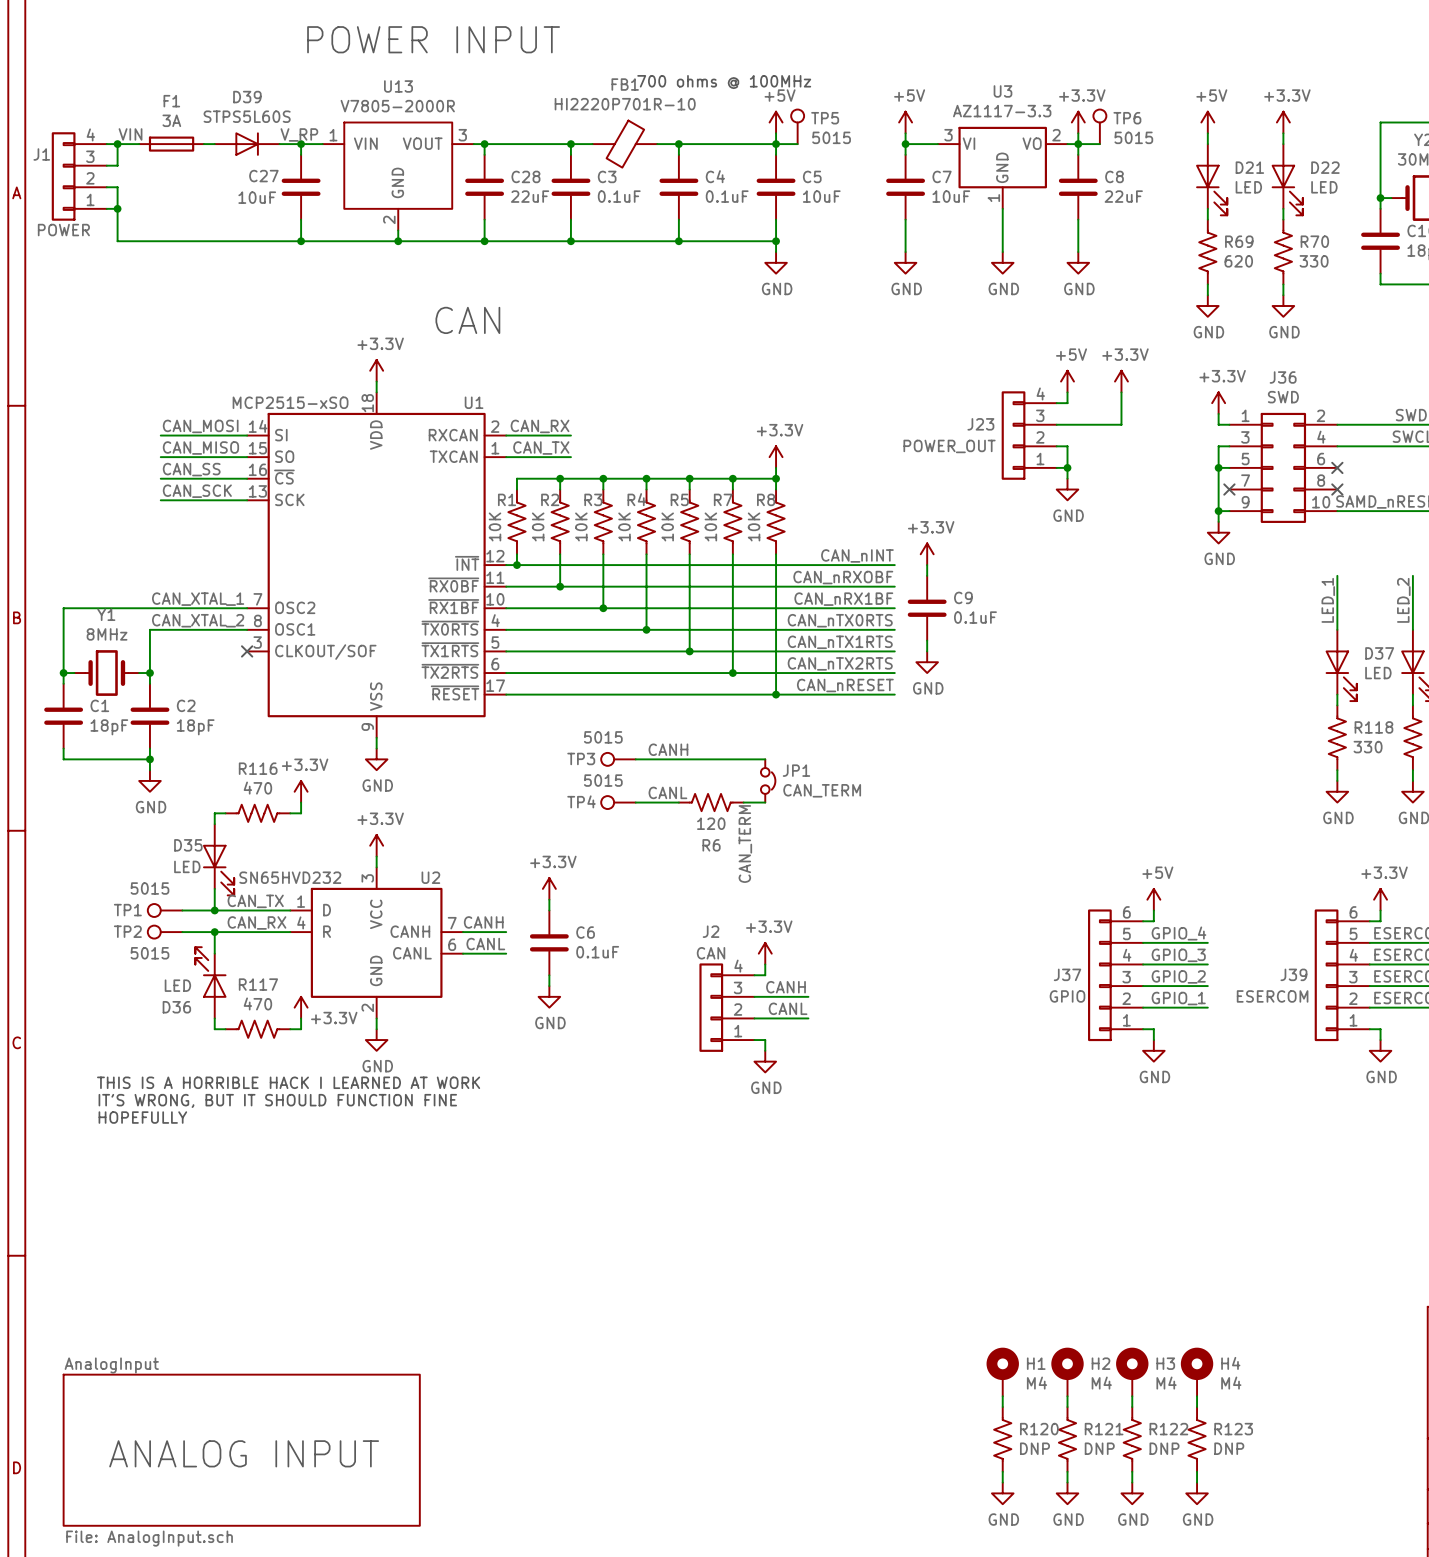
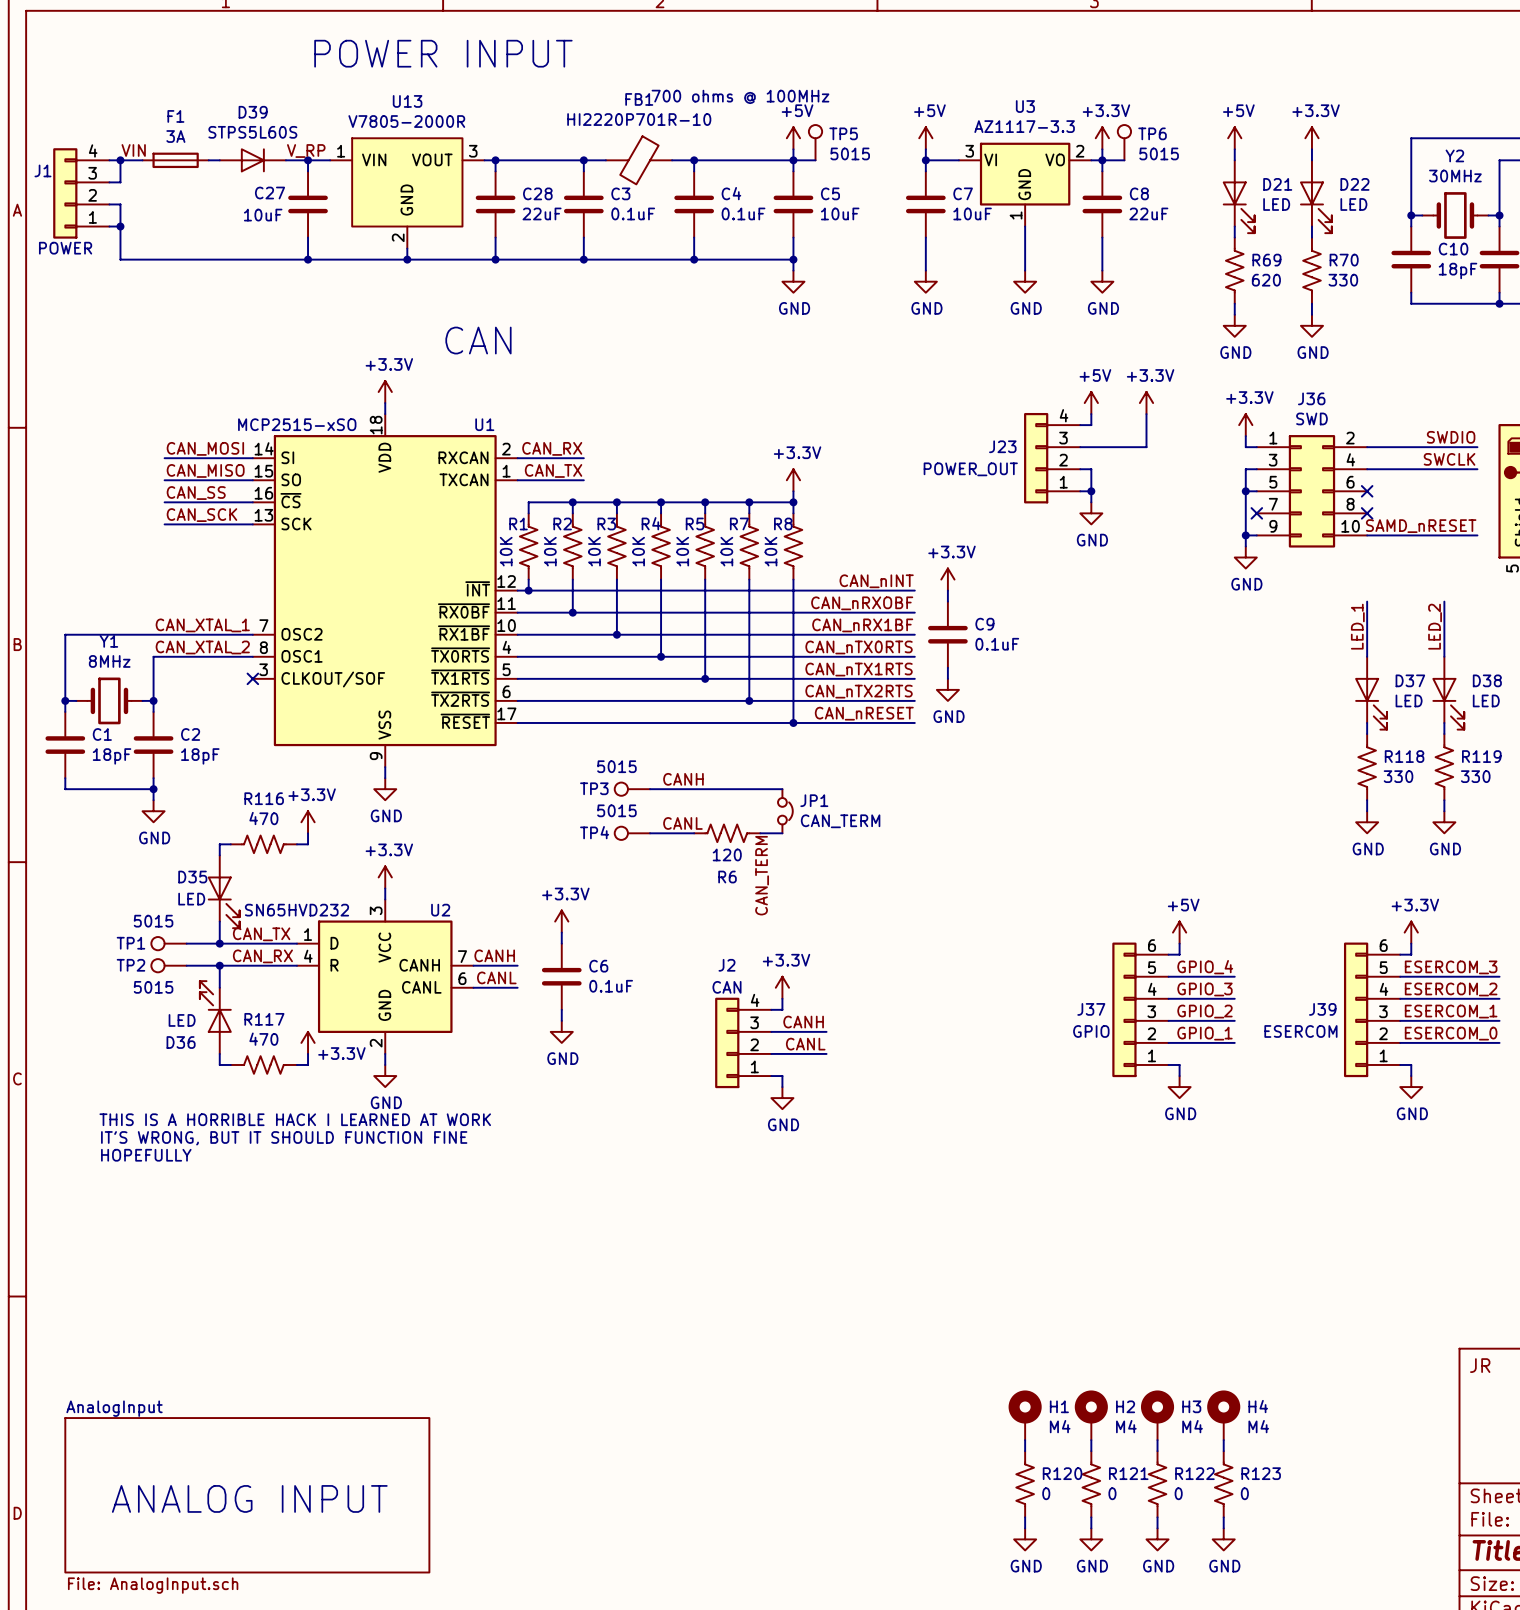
R120 value: DNP (1034, 1448) -> 0 (1046, 1493)
R121 value: DNP (1099, 1448) -> 0 (1112, 1493)
R122 value: DNP (1164, 1448) -> 0 (1178, 1493)
R123 value: DNP (1229, 1448) -> 0 (1244, 1493)

